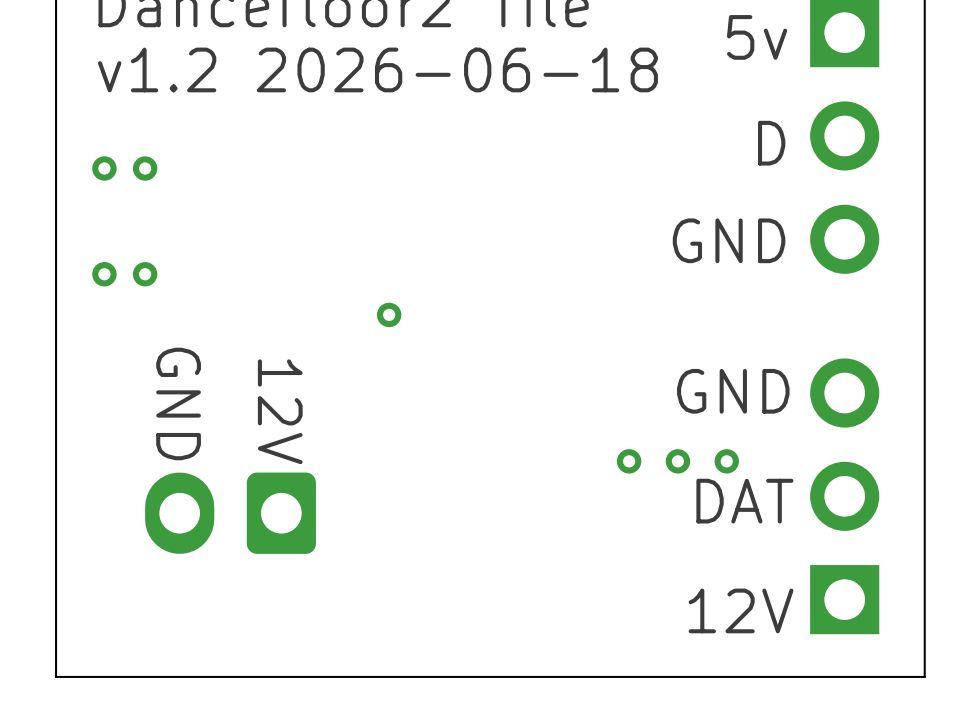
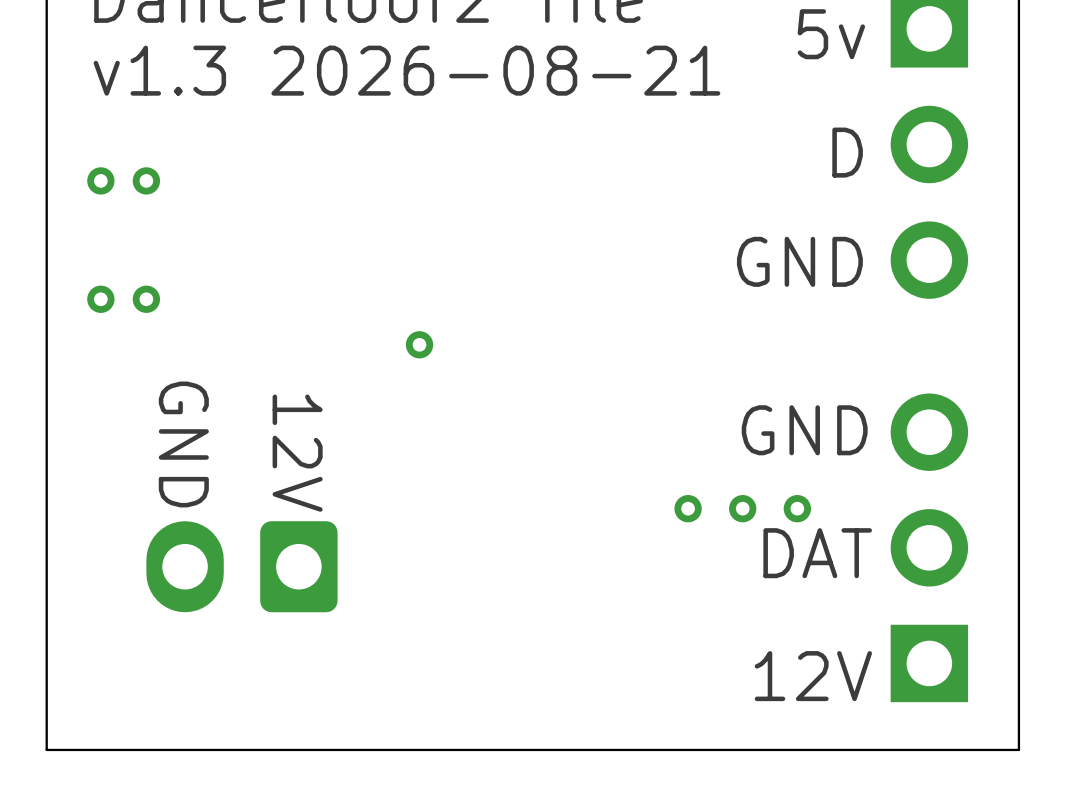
text: v1.2 2026-06-18 (377, 69) -> v1.3 2026-08-21 (406, 70)

